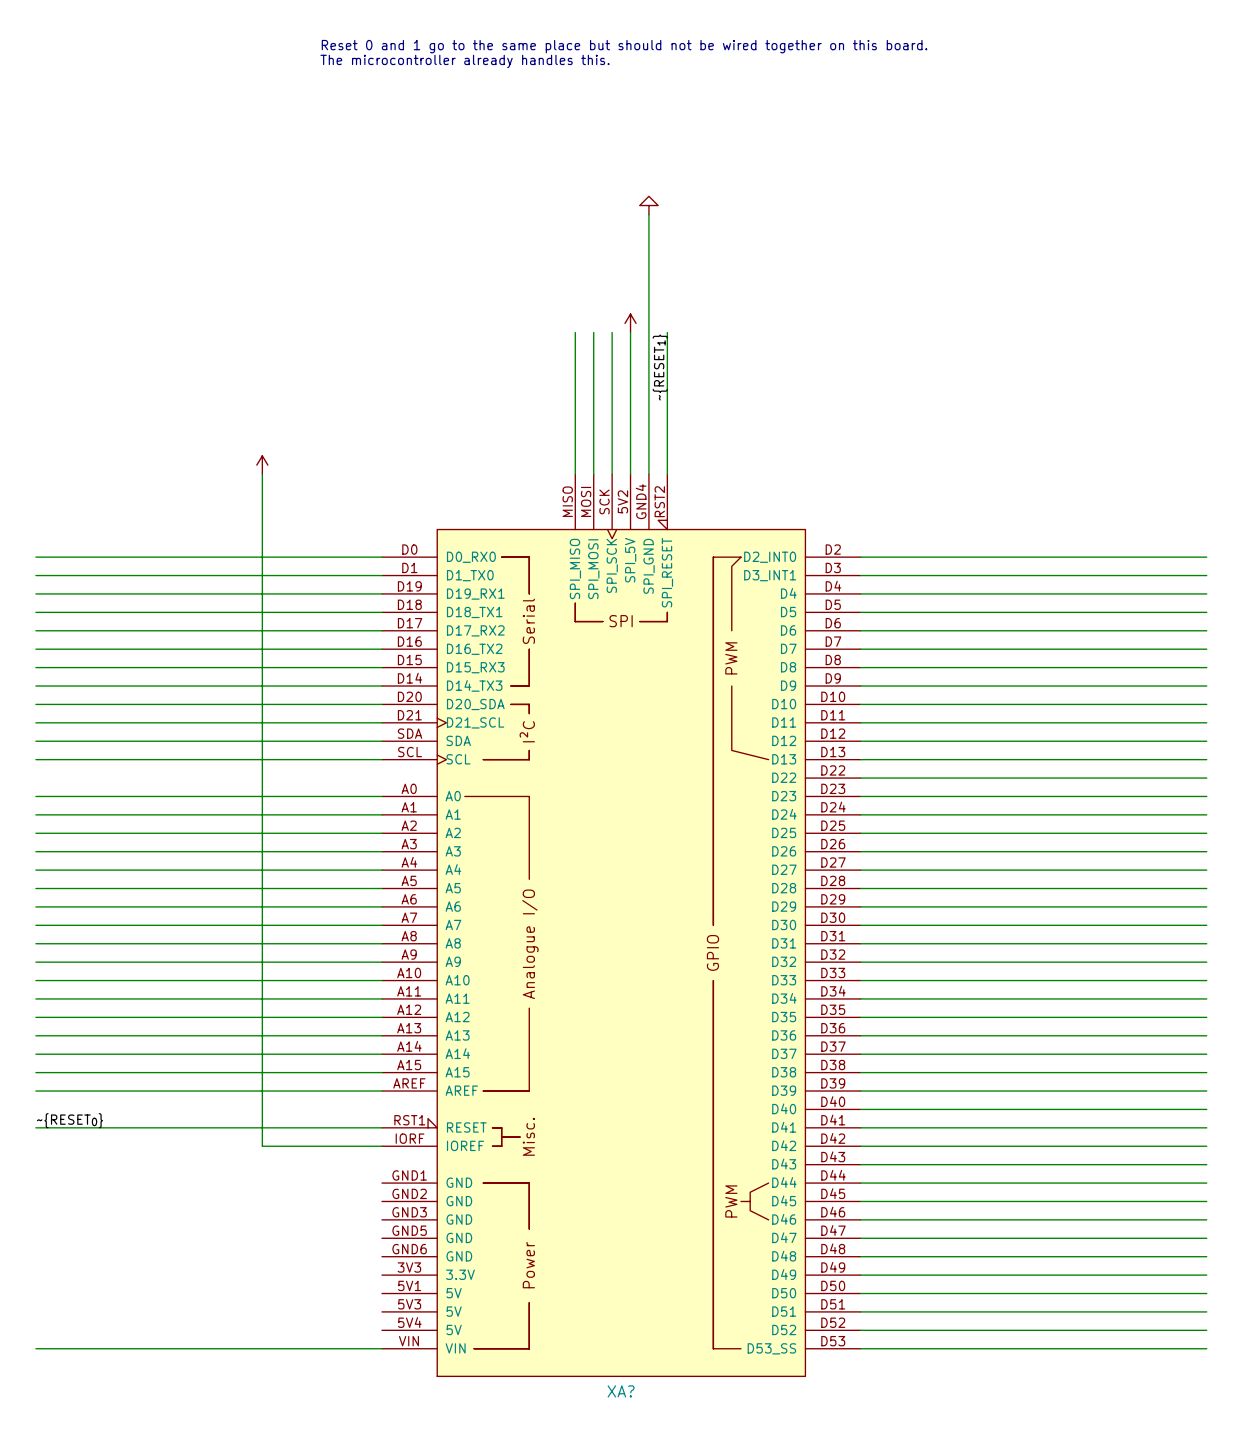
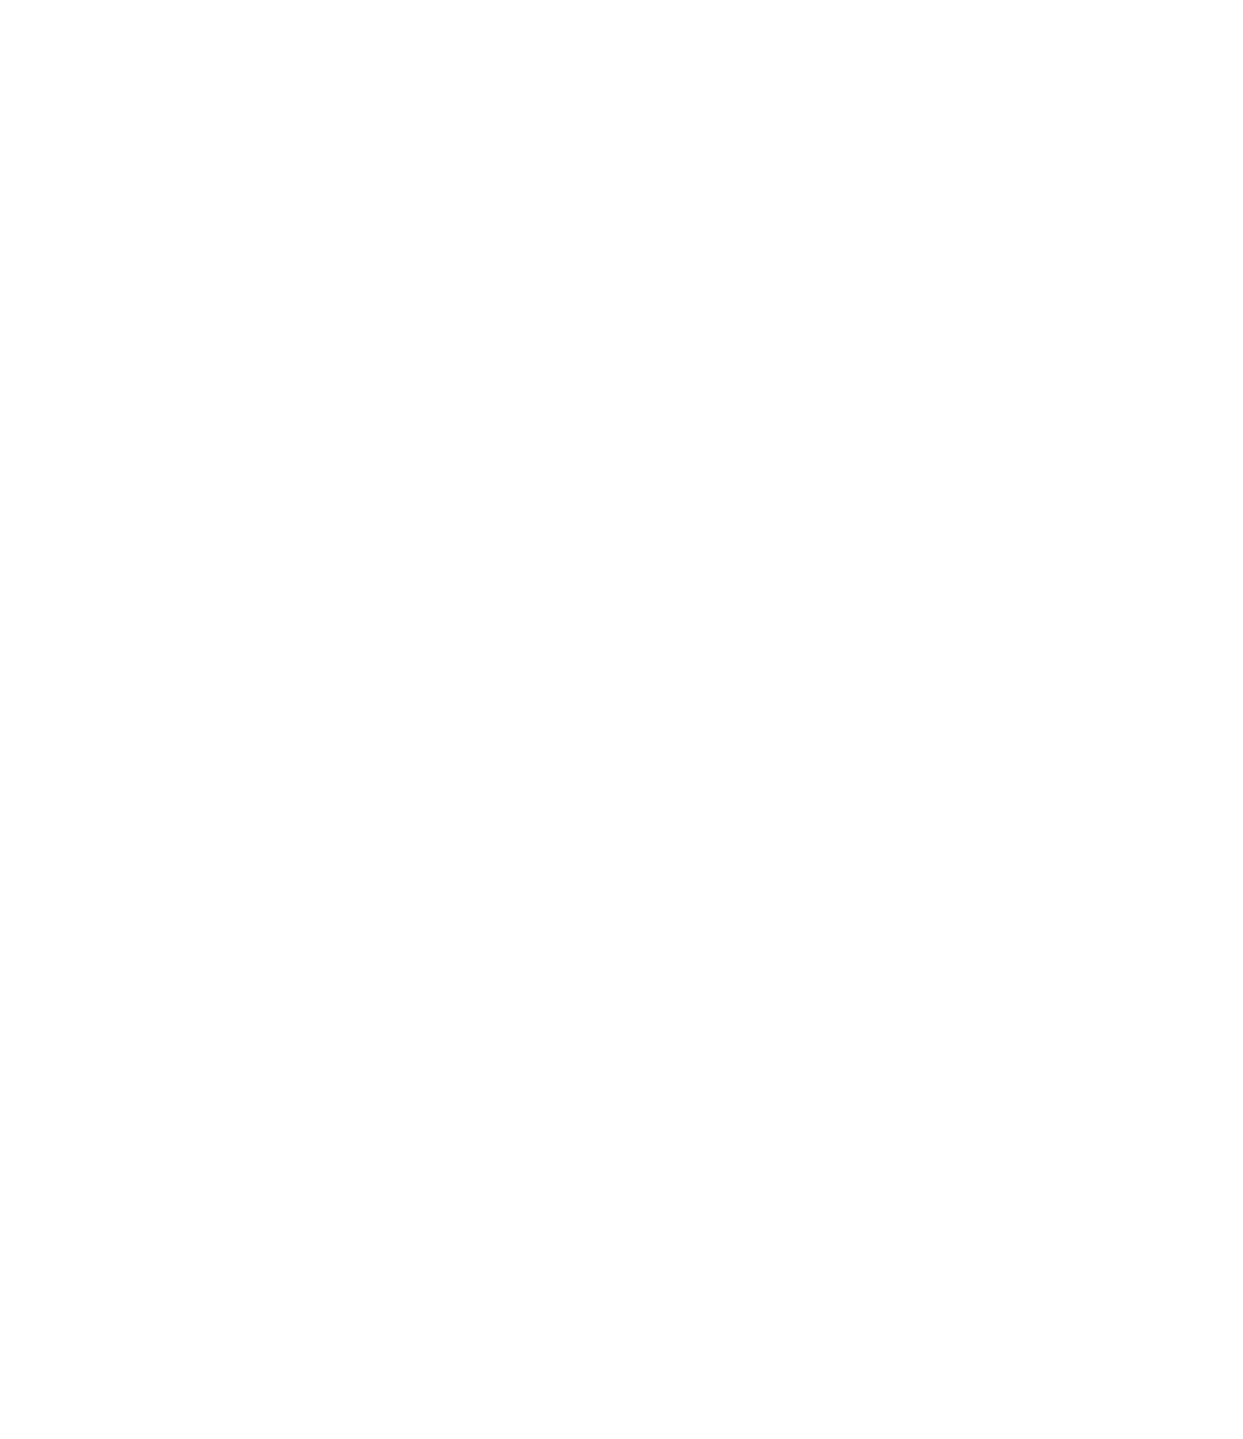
text: Reset 0 and 1 go to the same place but should not be wired together on this board. (624, 46) -> none
text: The microcontroller already handles this. (465, 61) -> none
power symbol: (648, 205) -> none
wire: (648, 214) (648, 474) -> none
power symbol: (630, 323) -> none
wire: (575, 332) (575, 474) -> none
wire: (593, 332) (593, 474) -> none
wire: (612, 332) (612, 474) -> none
wire: (630, 332) (630, 474) -> none
wire: (667, 332) (667, 474) -> none
label: ~{RESET1} (660, 367) -> none
power symbol: (262, 465) -> none
wire: (262, 474) (262, 1146) (382, 1146) -> none
wire: (35, 557) (382, 557) -> none
wire: (860, 557) (1206, 557) -> none
wire: (35, 575) (382, 575) -> none
wire: (860, 575) (1206, 575) -> none
wire: (35, 593) (382, 593) -> none
wire: (860, 593) (1206, 593) -> none
wire: (35, 612) (382, 612) -> none
wire: (860, 612) (1206, 612) -> none
wire: (35, 630) (382, 630) -> none
wire: (860, 630) (1206, 630) -> none
wire: (35, 649) (382, 649) -> none
wire: (860, 649) (1206, 649) -> none
wire: (35, 667) (382, 667) -> none
wire: (860, 667) (1206, 667) -> none
wire: (35, 686) (382, 686) -> none
wire: (860, 686) (1206, 686) -> none
wire: (35, 704) (382, 704) -> none
wire: (860, 704) (1206, 704) -> none
wire: (35, 722) (382, 722) -> none
wire: (860, 722) (1206, 722) -> none
wire: (35, 741) (382, 741) -> none
wire: (860, 741) (1206, 741) -> none
wire: (35, 759) (382, 759) -> none
wire: (860, 759) (1206, 759) -> none
wire: (860, 778) (1206, 778) -> none
wire: (35, 796) (382, 796) -> none
wire: (860, 796) (1206, 796) -> none
wire: (35, 814) (382, 814) -> none
wire: (860, 814) (1206, 814) -> none
wire: (35, 833) (382, 833) -> none
wire: (860, 833) (1206, 833) -> none
wire: (35, 851) (382, 851) -> none
wire: (860, 851) (1206, 851) -> none
wire: (35, 870) (382, 870) -> none
wire: (860, 870) (1206, 870) -> none
wire: (35, 888) (382, 888) -> none
wire: (860, 888) (1206, 888) -> none
wire: (35, 906) (382, 906) -> none
wire: (860, 906) (1206, 906) -> none
wire: (35, 925) (382, 925) -> none
XA?: (621, 925) -> none
wire: (860, 925) (1206, 925) -> none
wire: (35, 943) (382, 943) -> none
wire: (860, 943) (1206, 943) -> none
wire: (35, 962) (382, 962) -> none
wire: (860, 962) (1206, 962) -> none
wire: (35, 980) (382, 980) -> none
wire: (860, 980) (1206, 980) -> none
wire: (35, 998) (382, 998) -> none
wire: (860, 998) (1206, 998) -> none
wire: (35, 1017) (382, 1017) -> none
wire: (860, 1017) (1206, 1017) -> none
wire: (35, 1035) (382, 1035) -> none
wire: (860, 1035) (1206, 1035) -> none
wire: (35, 1054) (382, 1054) -> none
wire: (860, 1054) (1206, 1054) -> none
wire: (35, 1072) (382, 1072) -> none
wire: (860, 1072) (1206, 1072) -> none
wire: (35, 1091) (382, 1091) -> none
wire: (860, 1091) (1206, 1091) -> none
wire: (860, 1109) (1206, 1109) -> none
label: ~{RESET0} (69, 1120) -> none
wire: (35, 1127) (382, 1127) -> none
wire: (860, 1127) (1206, 1127) -> none
wire: (860, 1146) (1206, 1146) -> none
wire: (860, 1164) (1206, 1164) -> none
wire: (860, 1183) (1206, 1183) -> none
wire: (860, 1201) (1206, 1201) -> none
wire: (860, 1219) (1206, 1219) -> none
wire: (860, 1238) (1206, 1238) -> none
wire: (860, 1256) (1206, 1256) -> none
wire: (860, 1275) (1206, 1275) -> none
wire: (860, 1293) (1206, 1293) -> none
wire: (860, 1311) (1206, 1311) -> none
wire: (860, 1330) (1206, 1330) -> none
wire: (35, 1348) (382, 1348) -> none
wire: (860, 1348) (1206, 1348) -> none

